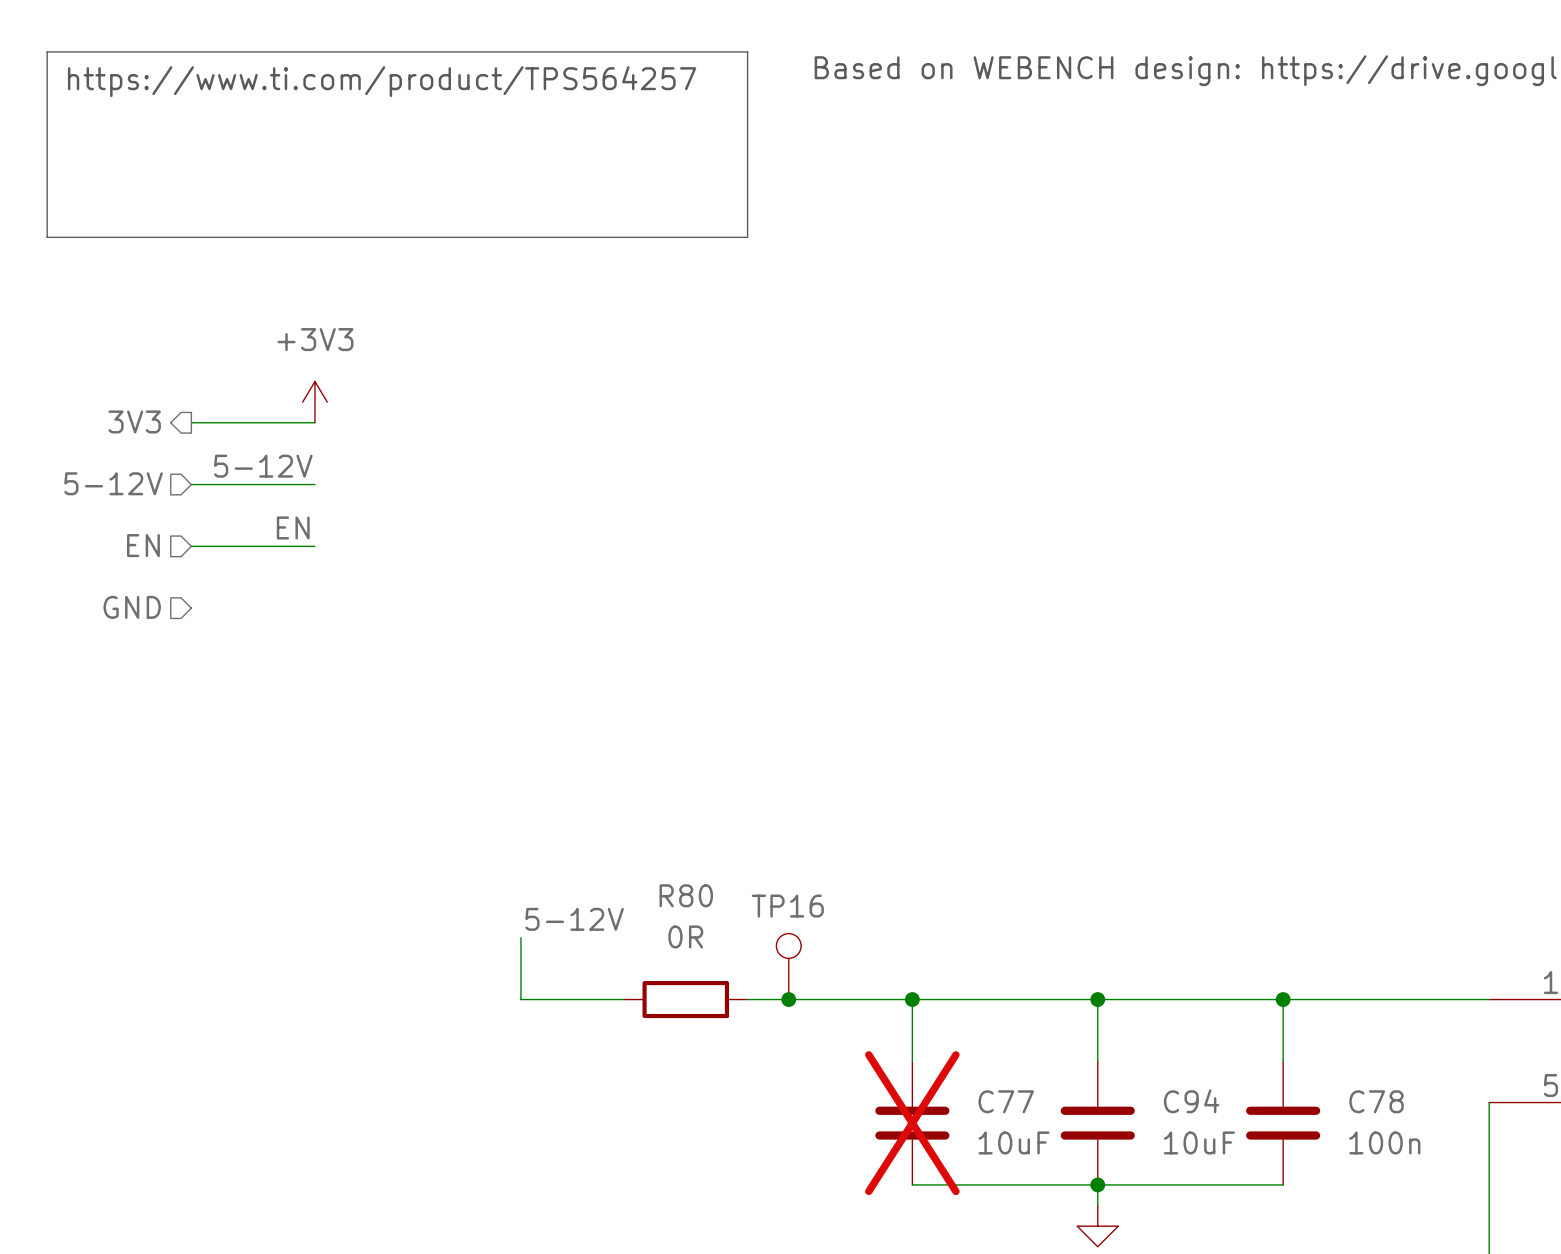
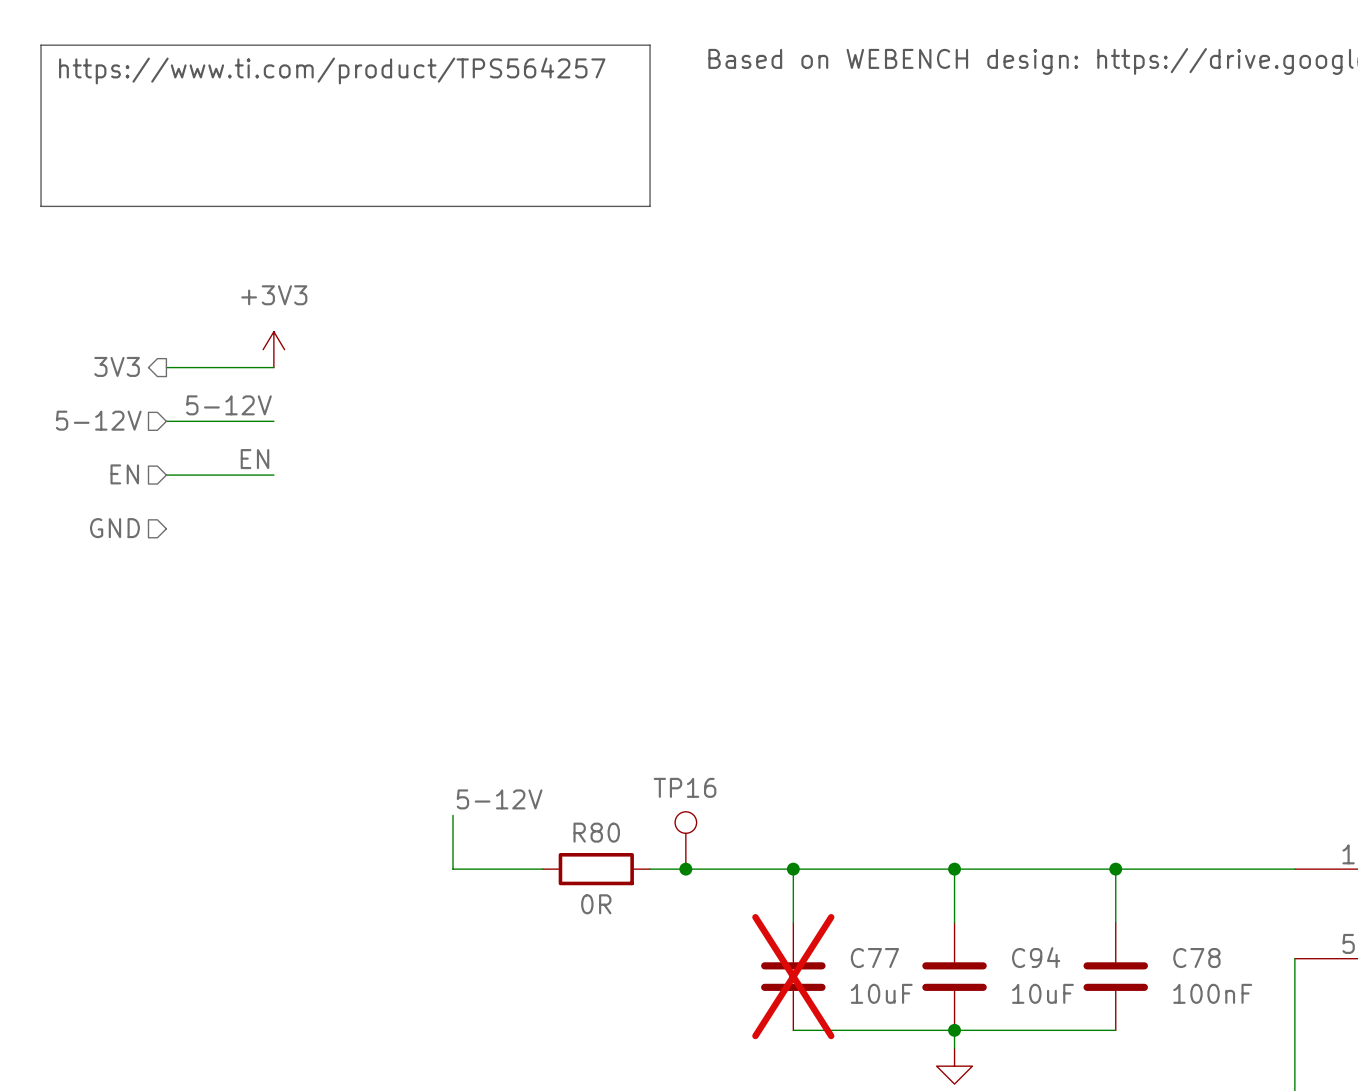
R80 name position: R80 (686, 895) -> R80 (596, 832)
R80 value position: 0R (685, 936) -> 0R (596, 904)
C78 value: 100n (1384, 1142) -> 100nF (1212, 993)

